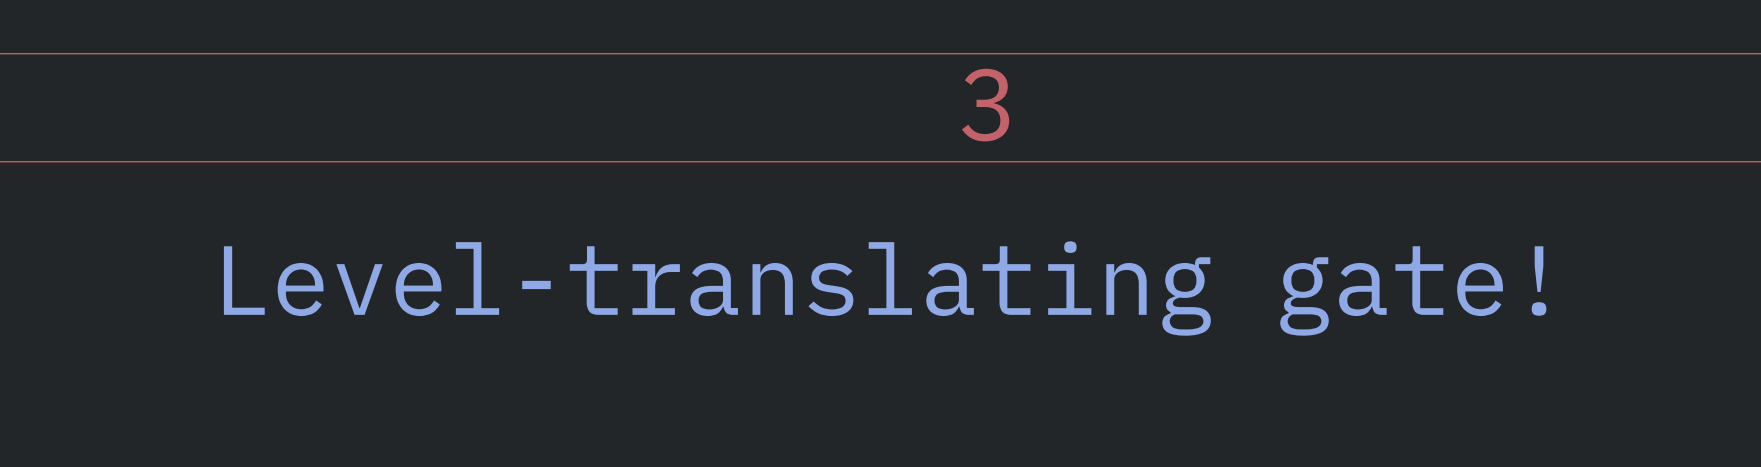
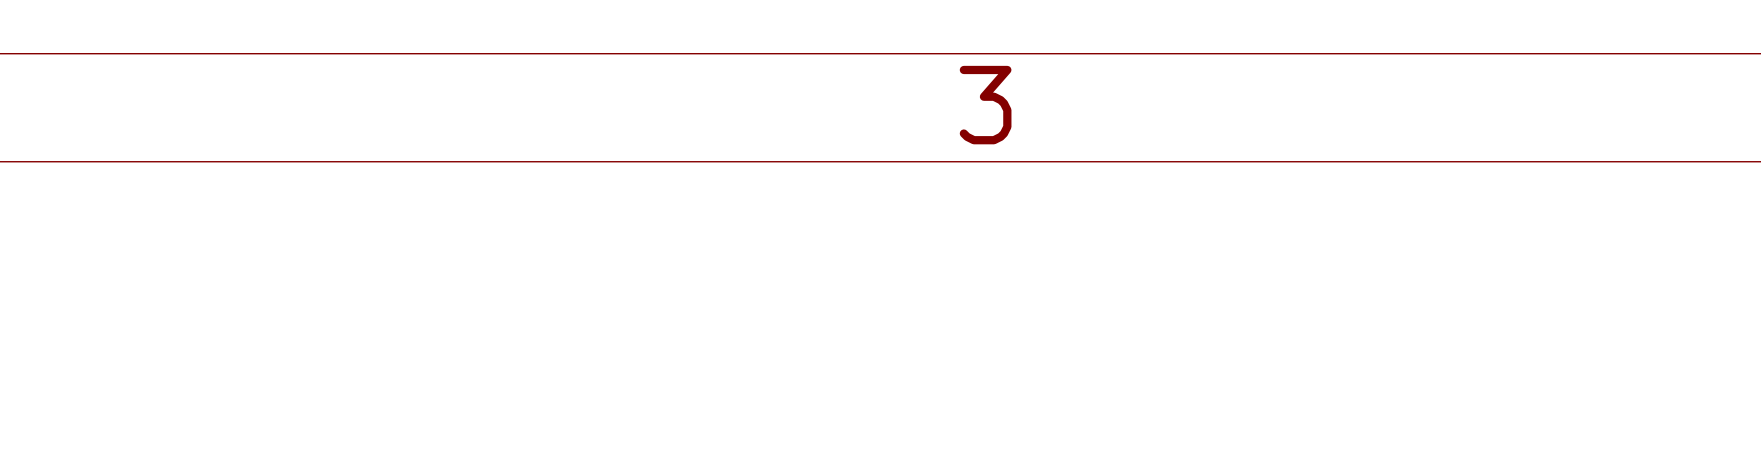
text: Level-translating gate! (885, 288) -> none

